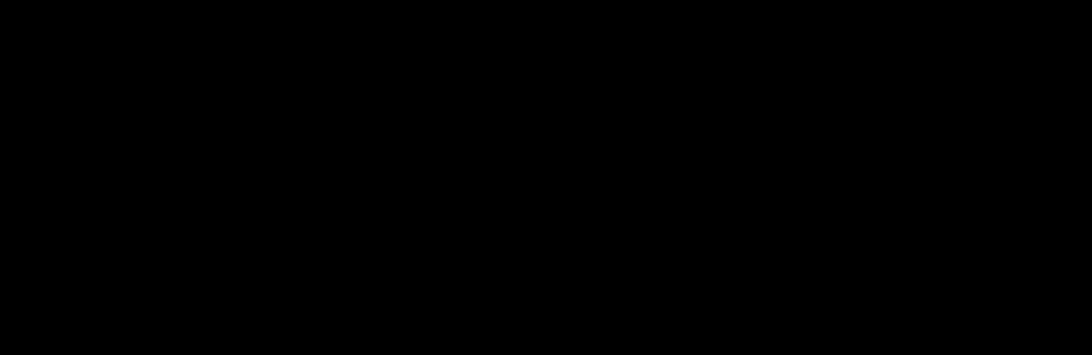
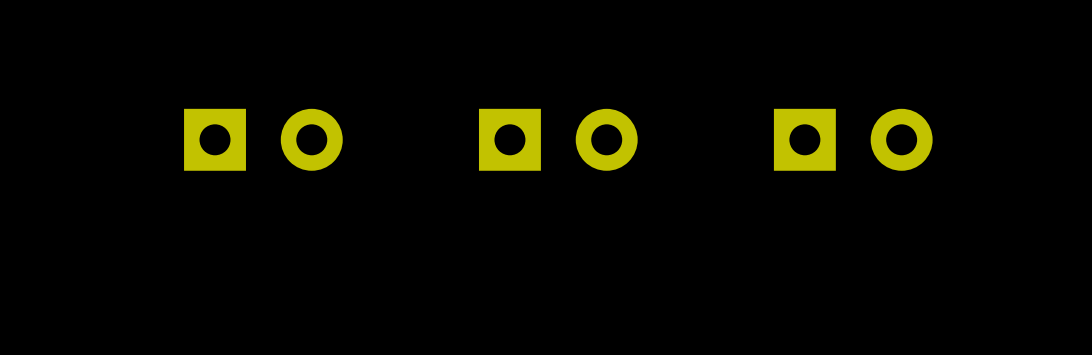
part: none -> (263, 139)
part: none -> (558, 139)
part: none -> (853, 139)

